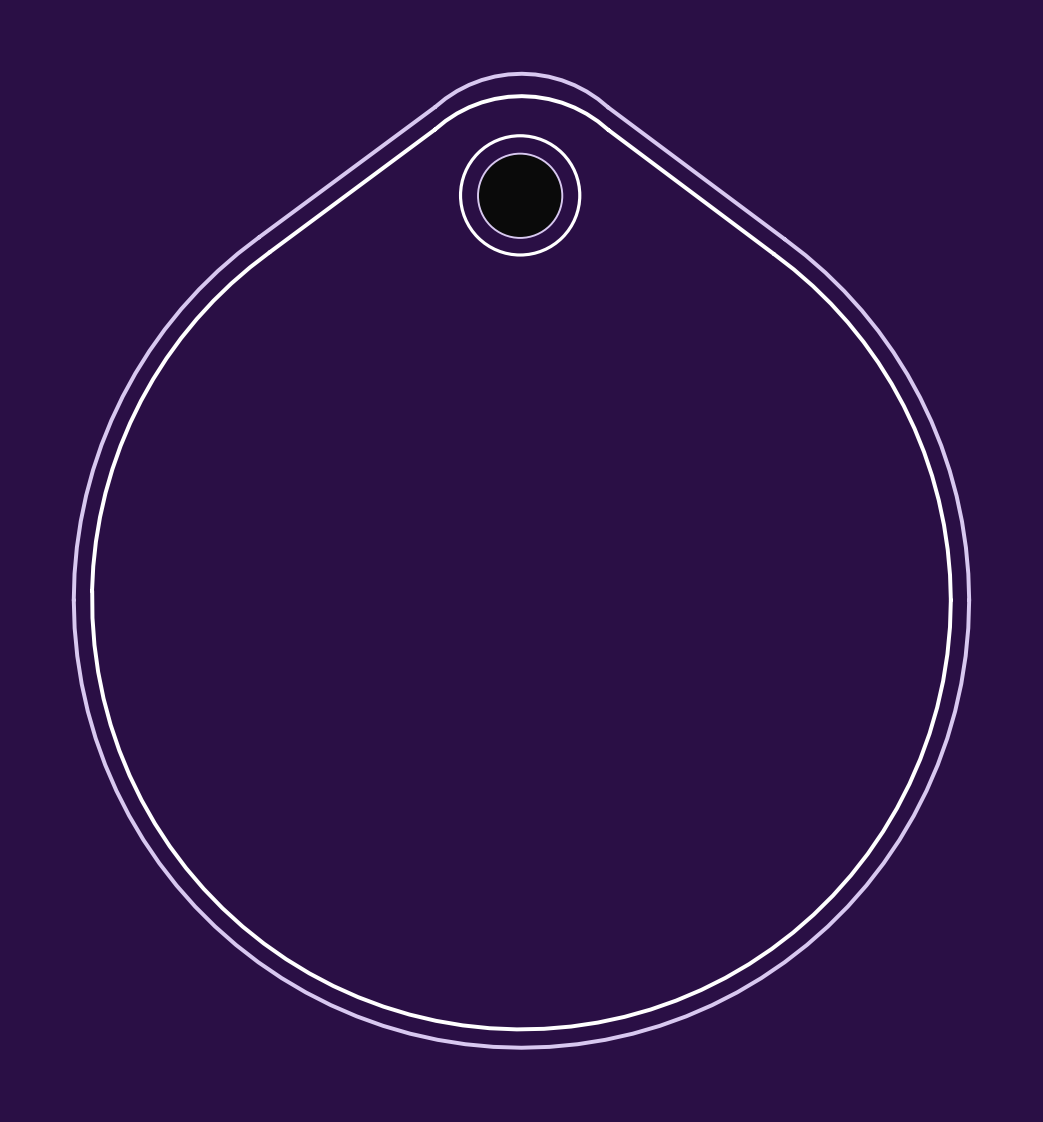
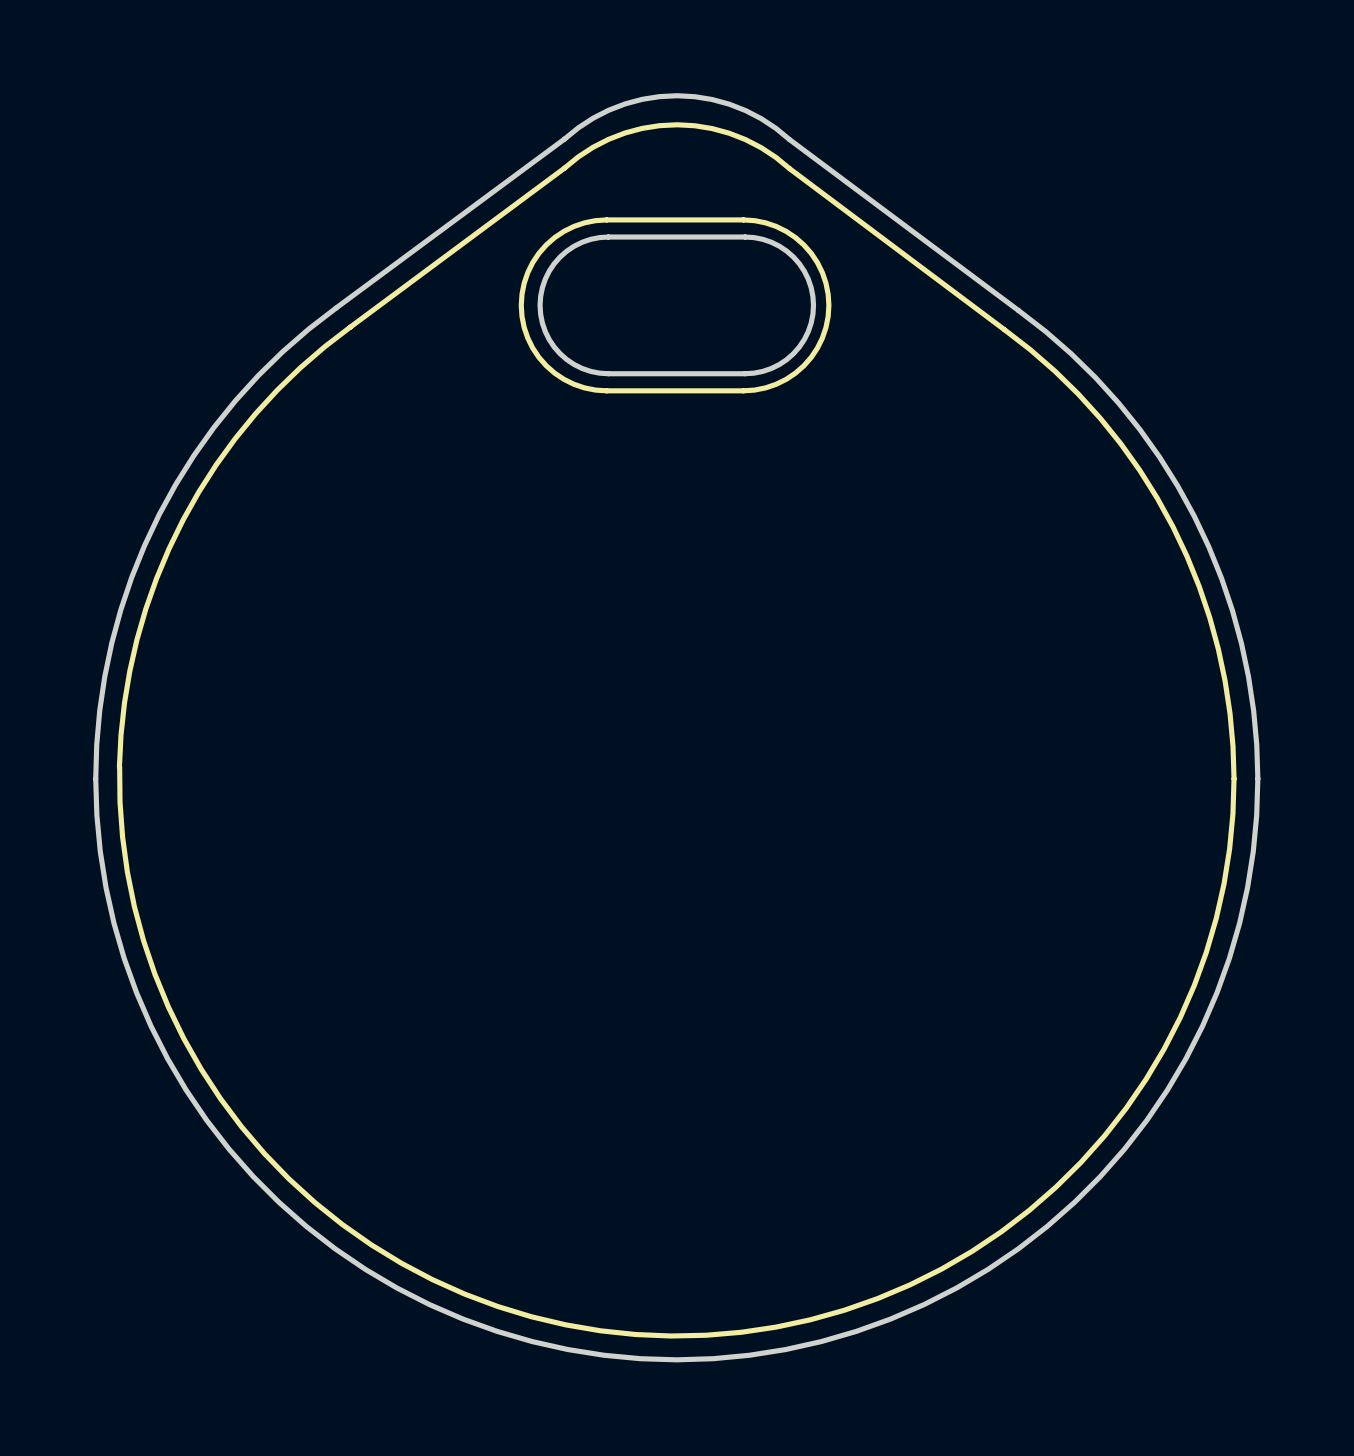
drawing: [458, 134, 582, 257] -> none
line: none -> (606, 219) (743, 219) (765, 222) (786, 231) (811, 253) (825, 283) (828, 316) (817, 348) (795, 373) (776, 384) (754, 390) (606, 390) (584, 387) (563, 379) (538, 357) (527, 338) (521, 305) (524, 283) (538, 253) (554, 237) (584, 222) (606, 219)
board edge: none -> (608, 237) (745, 237) (762, 239) (779, 246) (799, 263) (811, 287) (812, 314) (804, 339) (786, 359) (771, 368) (754, 373) (608, 373) (590, 371) (574, 364) (560, 353) (545, 331) (540, 305) (542, 287) (549, 271) (566, 251) (590, 239) (608, 237)
part: (520, 195) -> none

